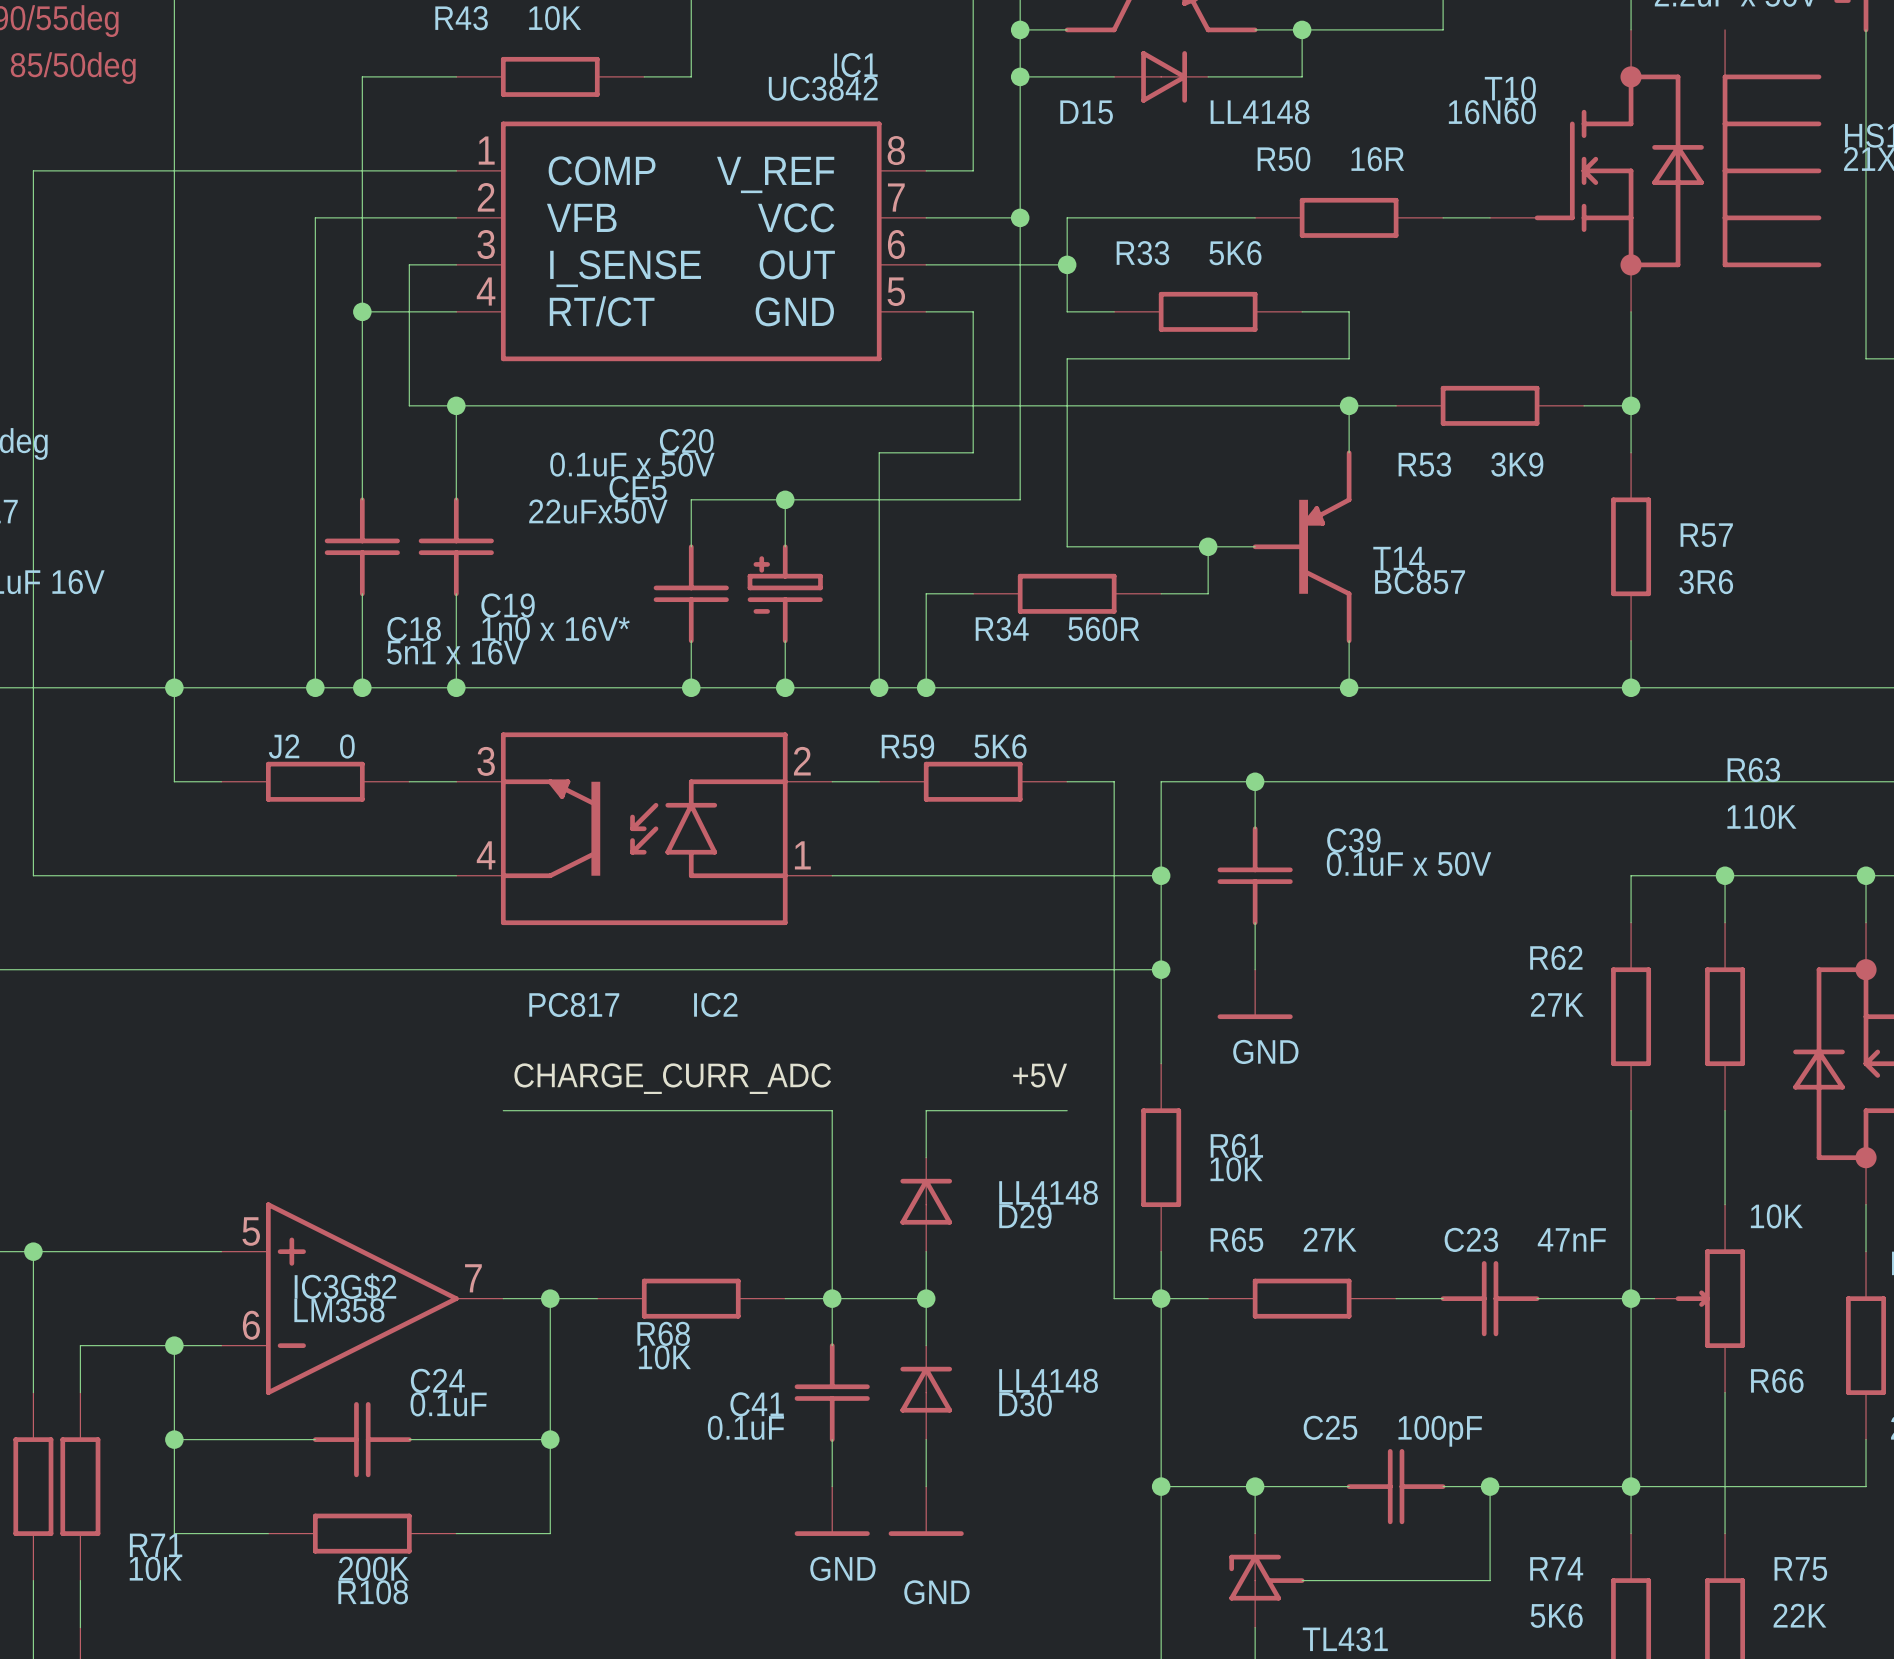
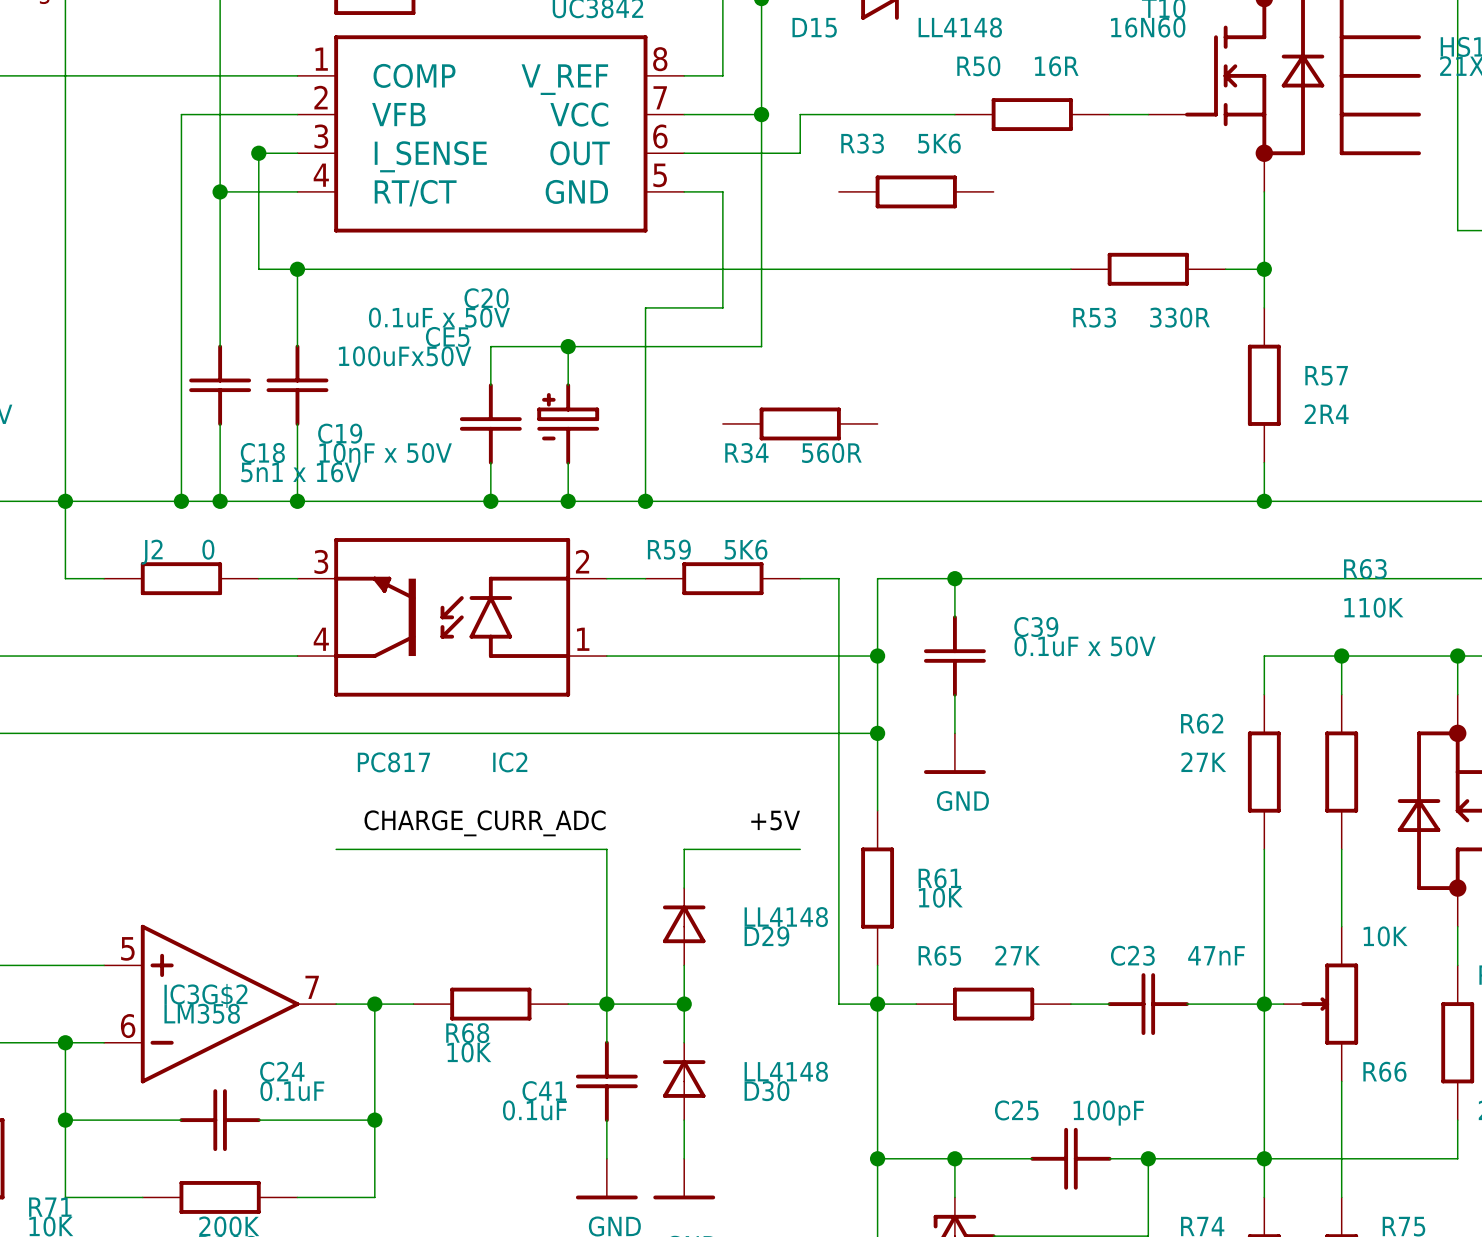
junction: none -> (258, 153)
wire: (1067, 264) (1067, 311) (1114, 311) -> none
junction: (1067, 264) -> none
wire: (1302, 311) (1349, 311) (1349, 358) (1067, 358) (1067, 546) (1255, 546) -> none
wire: (1349, 405) (1349, 452) -> none
junction: (1349, 405) -> none
R53 value: 3K9 (1517, 464) -> 330R (1179, 317)
CE5 value: 22uFx50V (598, 511) -> 100uFx50V (405, 356)
wire: (1208, 546) (1208, 593) (1161, 593) -> none
junction: (1208, 546) -> none
T14: BC857 (1302, 546) -> none
R57 value: 3R6 (1706, 582) -> 2R4 (1326, 414)
wire: (973, 593) (926, 593) (926, 687) -> none
C19 value: 1n0 x 16V* (555, 629) -> 10nF x 50V (385, 452)
wire: (1349, 640) (1349, 687) -> none
junction: (926, 687) -> none
junction: (1349, 687) -> none

